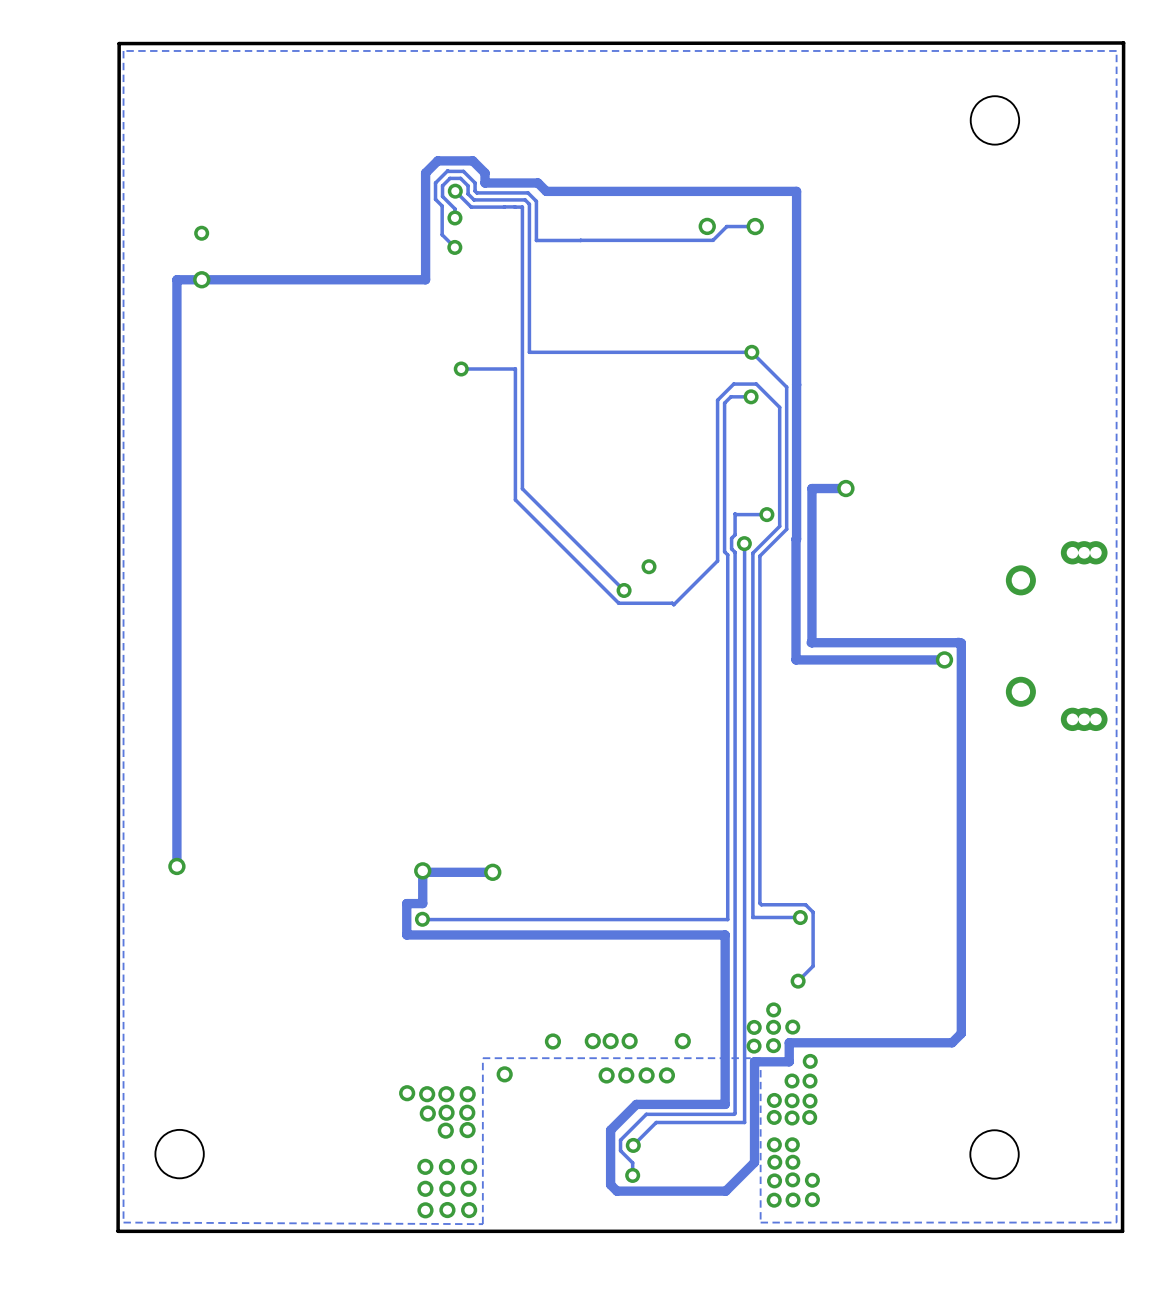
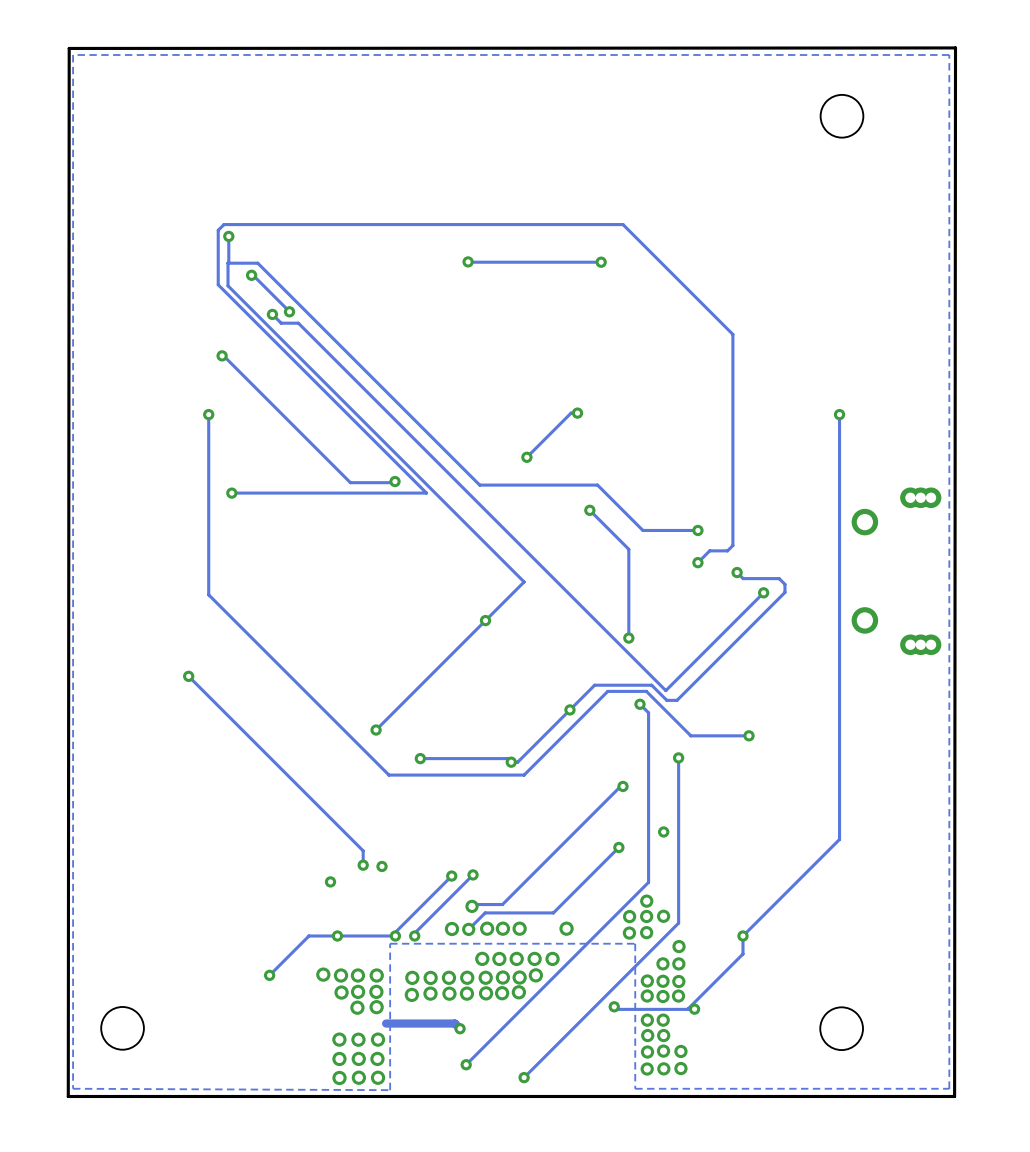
track: (455, 191) (471, 207) (504, 207) -> none
via: (455, 191) -> none
track: (514, 206) (504, 206) -> none
track: (515, 207) (522, 207) (522, 488) (624, 590) -> none
track: (454, 217) (454, 208) (442, 196) (442, 185) (450, 178) (460, 178) (468, 185) (468, 193) (474, 199) (525, 199) (529, 204) (529, 352) (751, 352) (786, 387) (786, 529) (759, 556) (759, 903) (805, 904) (813, 912) (813, 966) (798, 981) -> none
via: (454, 217) -> none
via: (707, 226) -> none
track: (755, 226) (726, 226) (713, 240) (536, 240) (536, 201) (528, 192) (476, 192) (475, 182) (463, 171) (447, 170) (435, 182) (435, 199) (442, 206) (442, 234) (454, 247) -> none
via: (755, 226) -> none
via: (201, 233) -> none
via: (454, 247) -> none
track: none -> (228, 236) (228, 263)
via: none -> (228, 236)
via: (201, 279) -> none
track: none -> (468, 261) (601, 262)
via: none -> (468, 261)
via: none -> (601, 262)
track: none -> (251, 275) (289, 311)
via: none -> (251, 275)
via: none -> (289, 311)
track: none -> (272, 314) (281, 323) (298, 323) (665, 690) (763, 592)
via: none -> (272, 314)
via: (751, 352) -> none
track: (461, 369) (515, 369) (515, 499) (618, 603) (673, 604) (717, 560) (717, 400) (733, 384) (756, 384) (779, 407) (779, 526) (752, 553) (752, 917) (800, 917) -> none
via: (461, 369) -> none
track: none -> (222, 355) (350, 482) (395, 481)
via: none -> (222, 355)
track: (751, 396) (730, 396) (724, 403) (724, 551) (727, 554) (727, 919) (422, 919) -> none
via: (751, 396) -> none
track: none -> (577, 413) (571, 413) (526, 457)
via: none -> (577, 413)
track: none -> (208, 414) (208, 594) (388, 775) (524, 775) (607, 691) (646, 691) (690, 735) (749, 735)
via: none -> (208, 414)
track: none -> (839, 414) (839, 839) (742, 936) (742, 954) (687, 1009) (616, 1009) (614, 1006)
via: none -> (839, 414)
track: (845, 488) (811, 488) (811, 642) -> none
via: (845, 488) -> none
via: none -> (526, 457)
track: (766, 514) (735, 513) (735, 534) (731, 538) (731, 548) (735, 552) (735, 1113) (646, 1114) (620, 1140) (620, 1150) (632, 1162) (632, 1175) -> none
via: (766, 514) -> none
via: none -> (395, 481)
track: (744, 543) (744, 1122) (656, 1122) (633, 1145) -> none
via: (744, 543) -> none
track: none -> (231, 493) (426, 493) (218, 284) (218, 230) (223, 224) (623, 224) (732, 334) (732, 545) (727, 550) (709, 550) (697, 562)
via: none -> (231, 493)
via: (649, 566) -> none
track: none -> (589, 510) (628, 549) (628, 638)
via: none -> (589, 510)
track: none -> (697, 530) (642, 530) (597, 485) (479, 485) (257, 263) (228, 263) (228, 285) (524, 581) (376, 730)
via: none -> (697, 530)
via: (624, 590) -> none
via: none -> (697, 562)
track: none -> (737, 572) (743, 578) (779, 578) (784, 584) (784, 592) (677, 700) (666, 700) (651, 685) (594, 685) (517, 762) (511, 762) (507, 758) (420, 758)
via: none -> (737, 572)
track: (958, 642) (961, 643) (961, 1033) (952, 1042) (789, 1042) (789, 1061) (754, 1061) (754, 1162) (725, 1191) (616, 1191) (610, 1184) (610, 1130) (636, 1104) (725, 1104) (725, 934) (406, 934) (406, 903) (422, 903) (422, 870) -> none
track: (958, 642) (811, 642) -> none
track: (944, 659) (796, 659) (796, 191) (546, 191) (537, 183) (485, 183) (485, 173) (472, 160) (437, 160) (425, 173) (425, 279) (176, 279) (176, 866) -> none
via: (944, 659) -> none
via: none -> (763, 592)
via: none -> (485, 620)
via: none -> (628, 638)
track: none -> (188, 676) (363, 850) (363, 865)
via: none -> (188, 676)
track: none -> (639, 704) (648, 712) (648, 882) (466, 1064)
via: none -> (639, 704)
via: none -> (569, 709)
via: none -> (376, 730)
via: none -> (749, 735)
track: none -> (678, 757) (678, 923) (524, 1077)
via: none -> (678, 757)
via: none -> (420, 758)
via: none -> (511, 762)
via: (176, 866) -> none
via: (422, 870) -> none
track: (492, 872) (422, 872) -> none
via: (492, 872) -> none
track: none -> (623, 786) (620, 786) (502, 904) (473, 904) (472, 906)
via: none -> (623, 786)
via: (800, 917) -> none
via: (422, 919) -> none
via: none -> (663, 831)
track: none -> (618, 847) (553, 912) (485, 912) (468, 929)
via: none -> (618, 847)
via: none -> (363, 865)
via: none -> (381, 866)
track: none -> (473, 874) (414, 933) (414, 936)
via: none -> (473, 874)
track: none -> (451, 876) (395, 932) (395, 936) (308, 936) (269, 975)
via: none -> (451, 876)
via: (798, 981) -> none
via: none -> (330, 881)
via: none -> (472, 906)
via: none -> (468, 929)
via: none -> (337, 936)
via: none -> (395, 936)
via: none -> (414, 936)
via: none -> (742, 936)
via: (504, 1074) -> none
via: none -> (482, 958)
via: none -> (269, 975)
via: none -> (535, 975)
via: none -> (412, 977)
via: none -> (430, 977)
via: none -> (448, 977)
via: none -> (467, 977)
via: none -> (485, 977)
via: none -> (502, 977)
via: none -> (519, 977)
via: none -> (518, 992)
via: none -> (430, 993)
via: none -> (449, 993)
via: none -> (466, 993)
via: none -> (486, 993)
via: none -> (502, 993)
via: none -> (411, 994)
via: none -> (614, 1006)
via: none -> (694, 1009)
via: (633, 1145) -> none
track: none -> (386, 1023) (454, 1023) (460, 1028)
via: none -> (460, 1028)
via: (632, 1175) -> none
via: none -> (466, 1064)
via: none -> (524, 1077)

